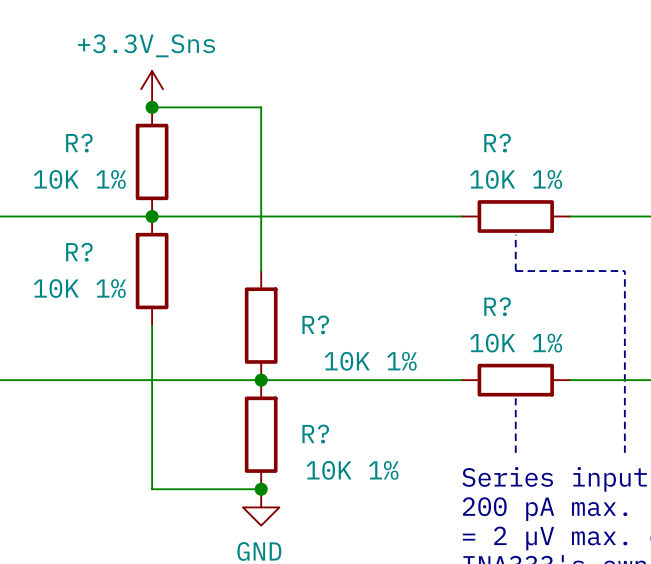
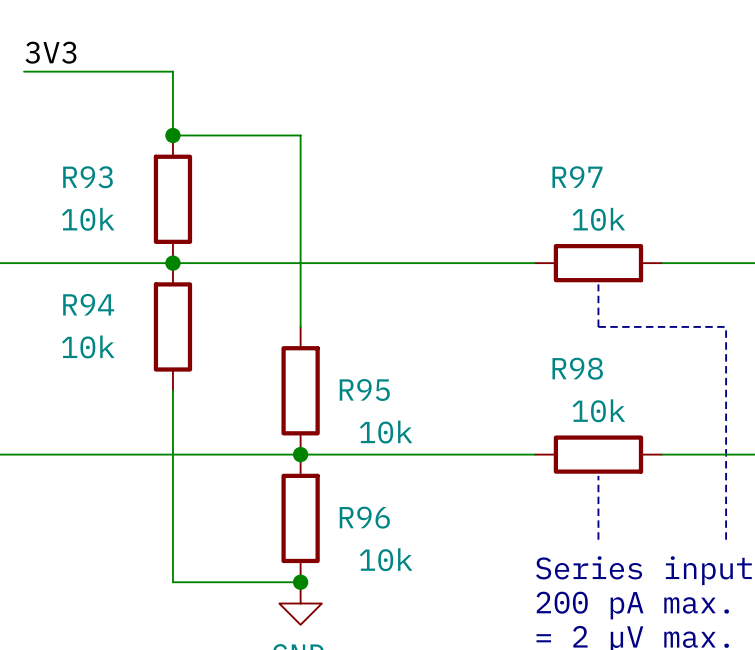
label: none -> 3V3 (50, 52)
wire: none -> (24, 71) (172, 71) (172, 135)
power symbol: +3.3V_Sns (152, 89) -> none
R? name: R? (79, 143) -> R93 (87, 177)
R? name: R? (497, 143) -> R97 (577, 177)
R? value: 10K 1% (79, 179) -> 10k (88, 219)
R? value: 10K 1% (516, 179) -> 10k (598, 219)
R? name: R? (79, 252) -> R94 (88, 304)
R? value: 10K 1% (79, 288) -> 10k (88, 346)
R? name: R? (497, 306) -> R98 (577, 368)
R? name: R? (315, 324) -> R95 (364, 389)
R? value: 10K 1% (516, 343) -> 10k (598, 410)
R? value: 10K 1% (370, 361) -> 10k (386, 432)
R? name: R? (315, 433) -> R96 (364, 517)
R? value: 10K 1% (352, 470) -> 10k (386, 559)

